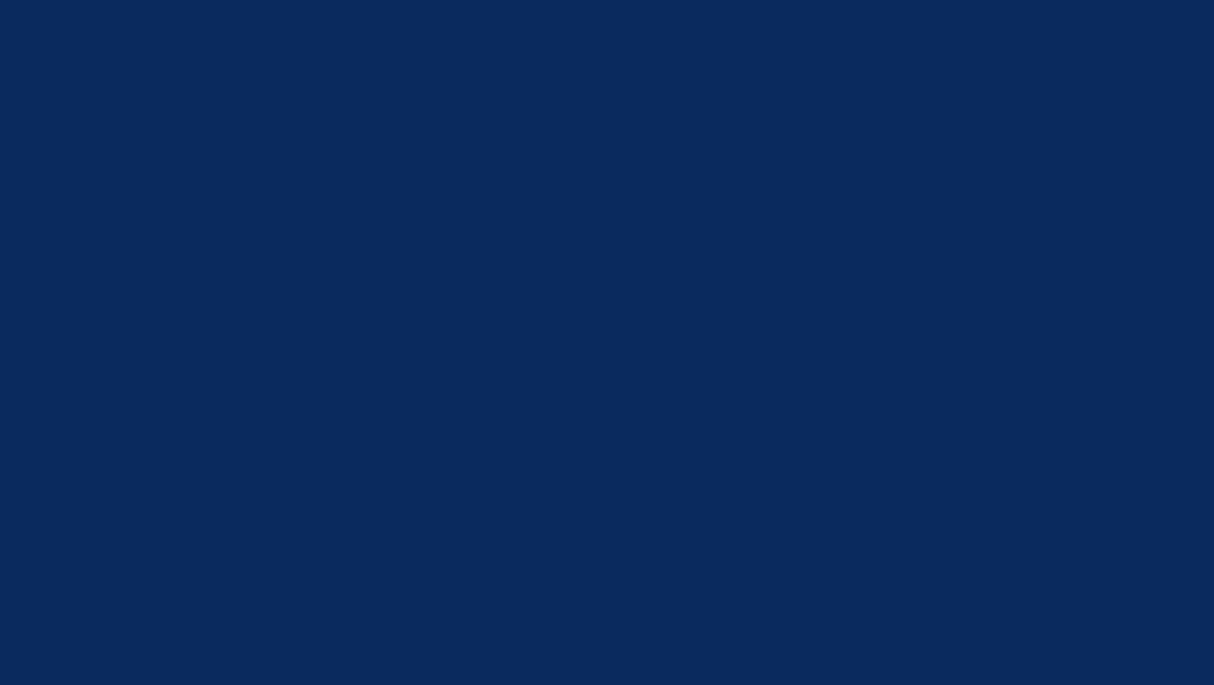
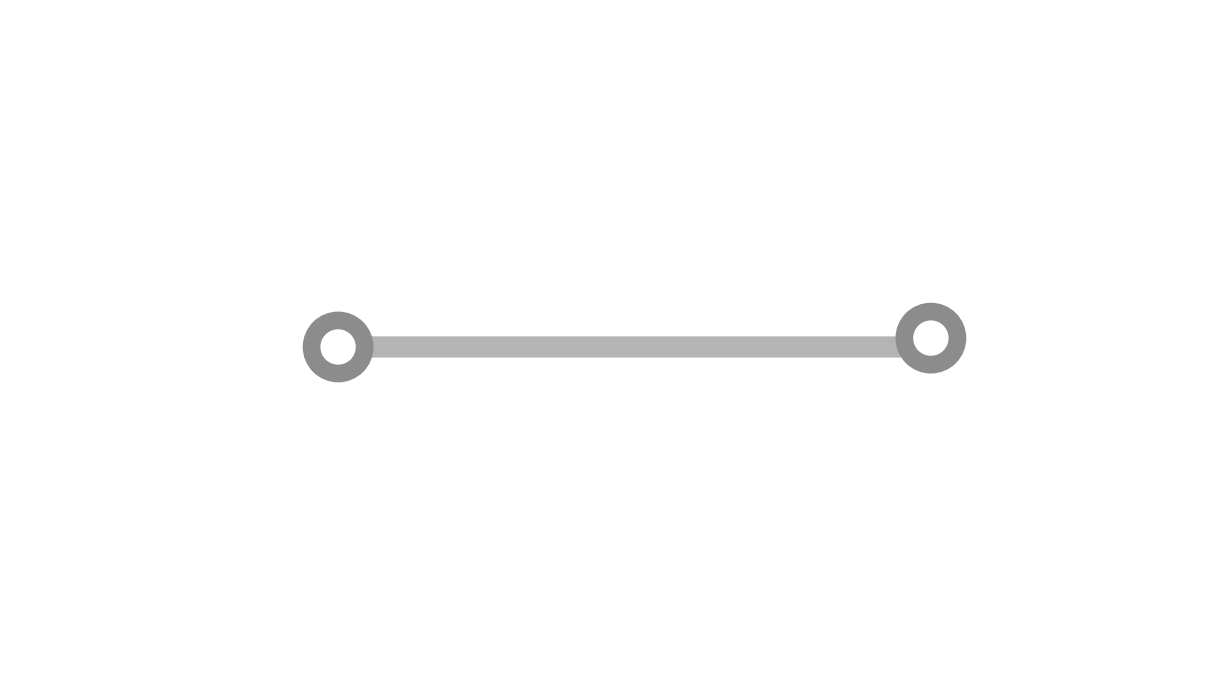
track: none -> (930, 338) (922, 346) (338, 346)
via: none -> (930, 338)
via: none -> (338, 346)

